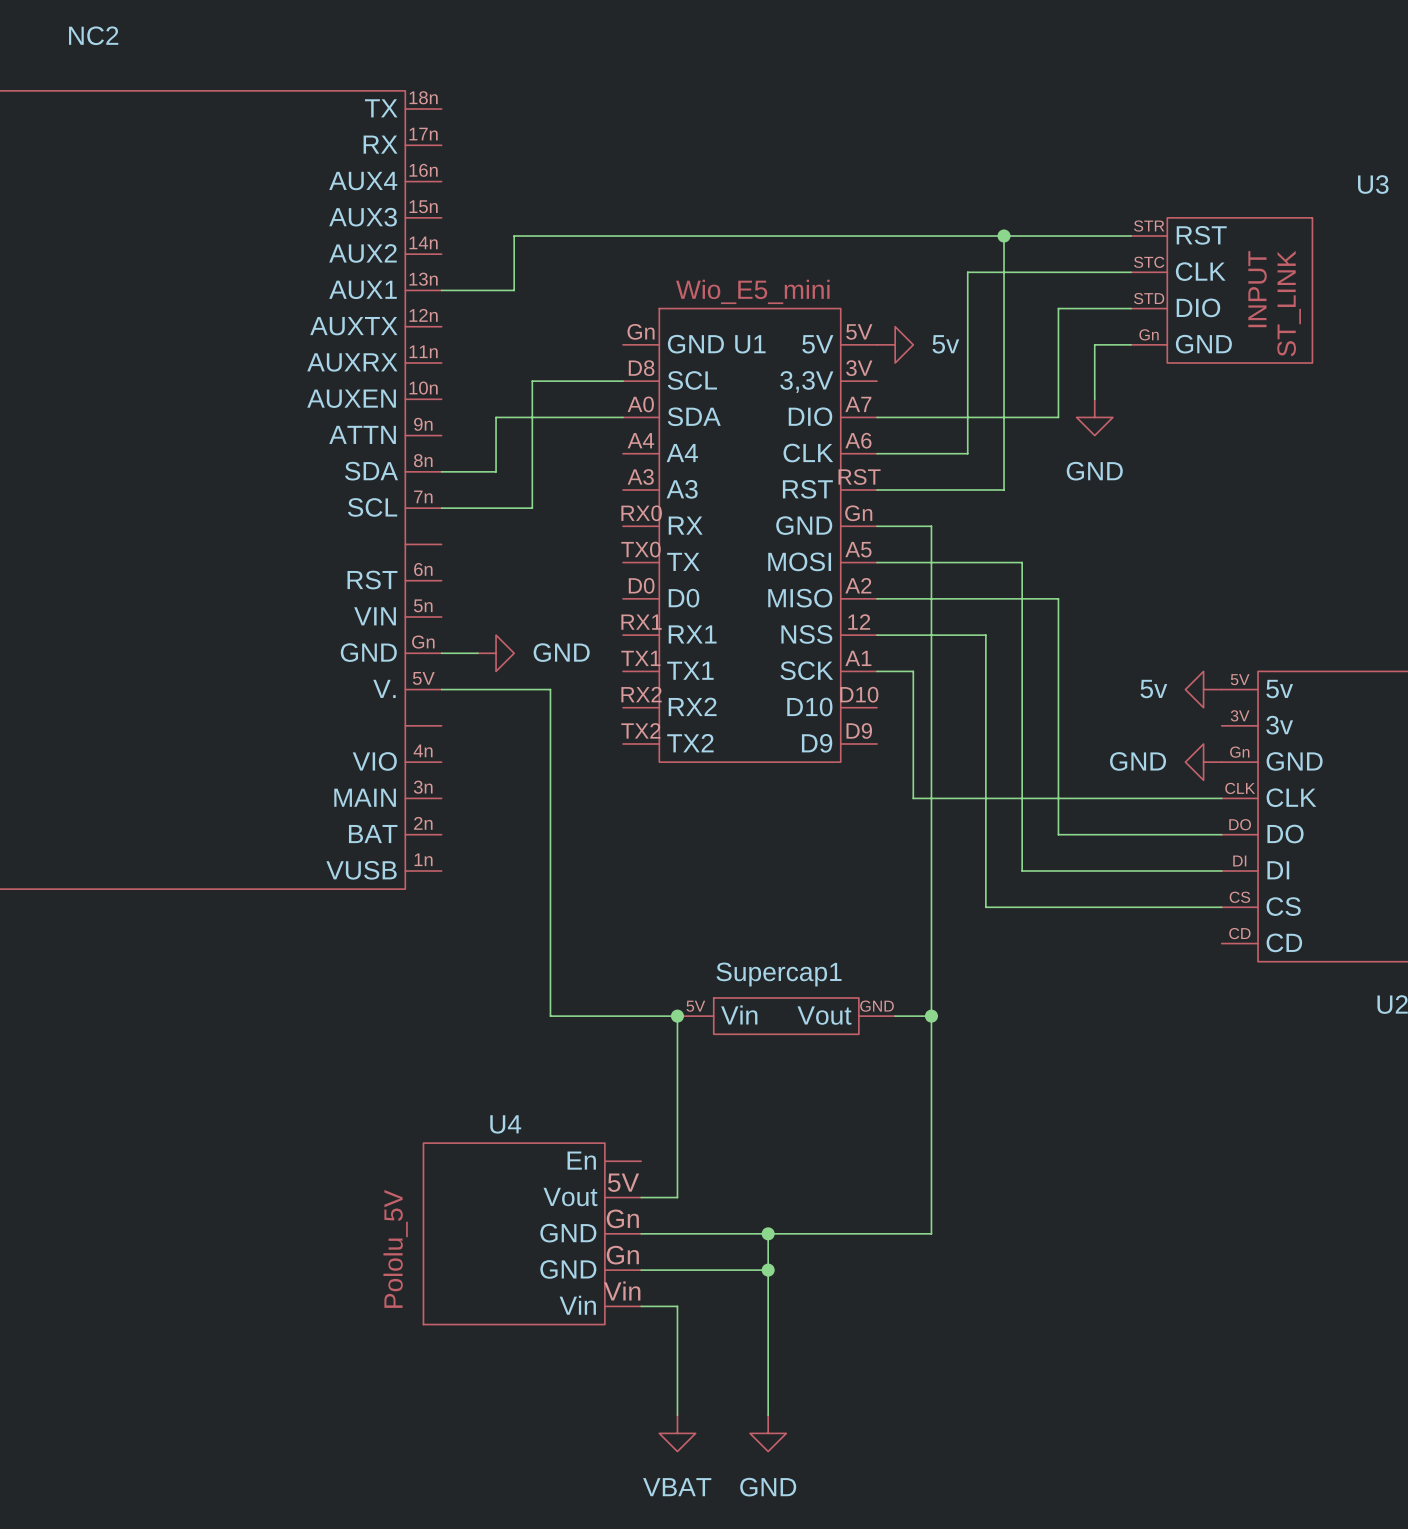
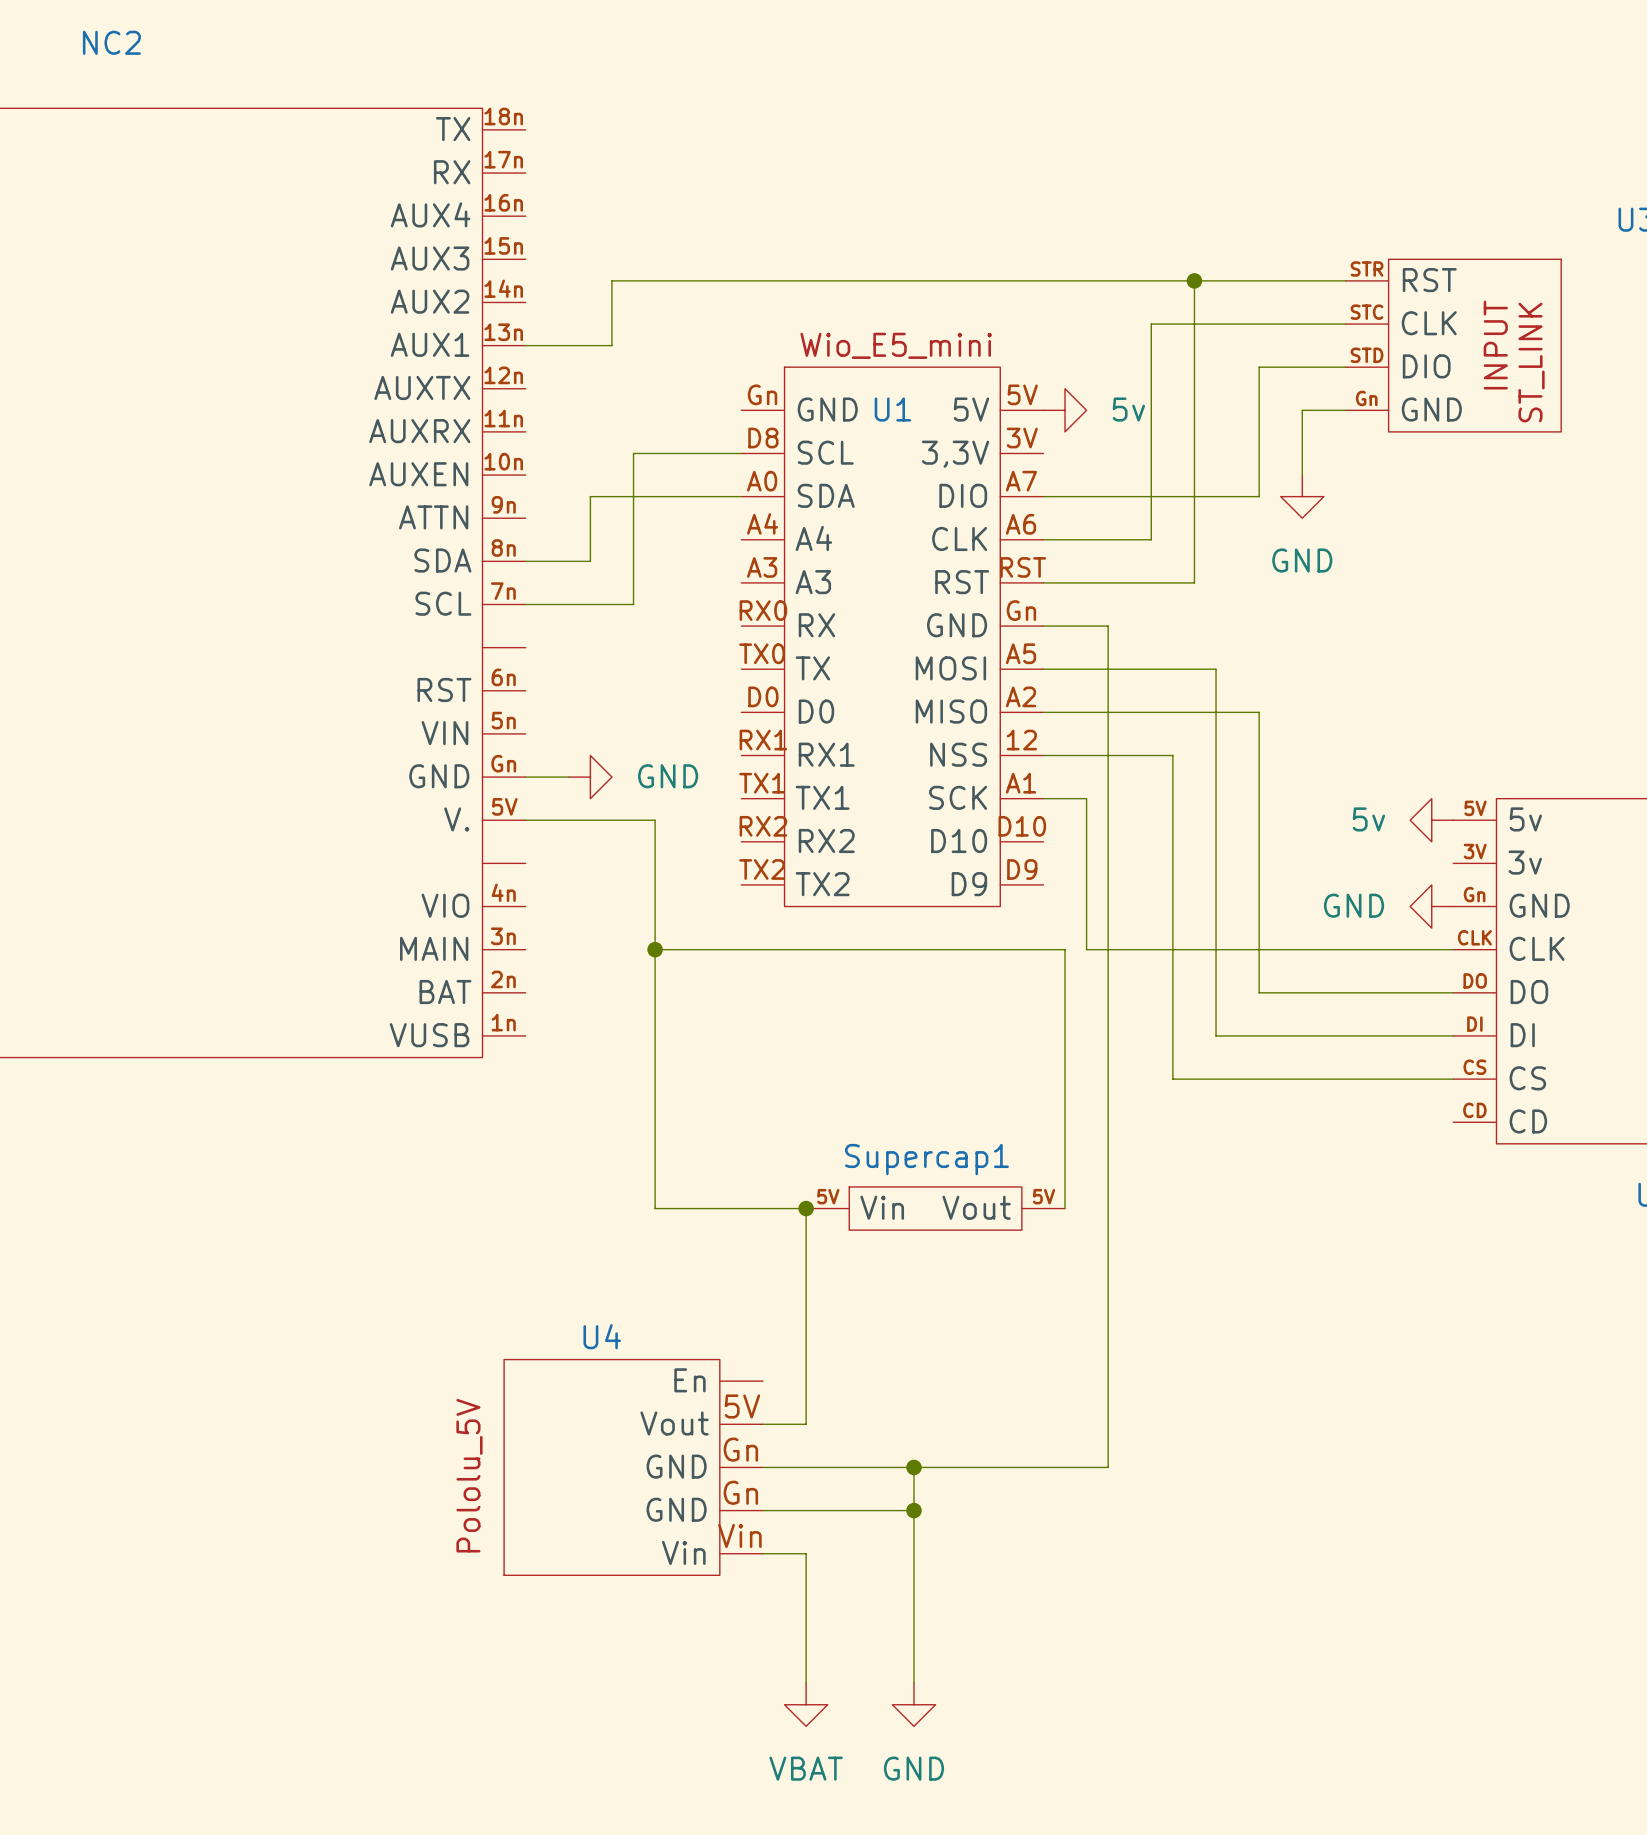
junction: none -> (655, 949)
Supercap1 pin number: GND (877, 1006) -> 5V (1044, 1196)
wire: (895, 1016) (931, 1016) -> (1065, 1208) (1065, 949) (655, 949)
junction: (931, 1016) -> none

